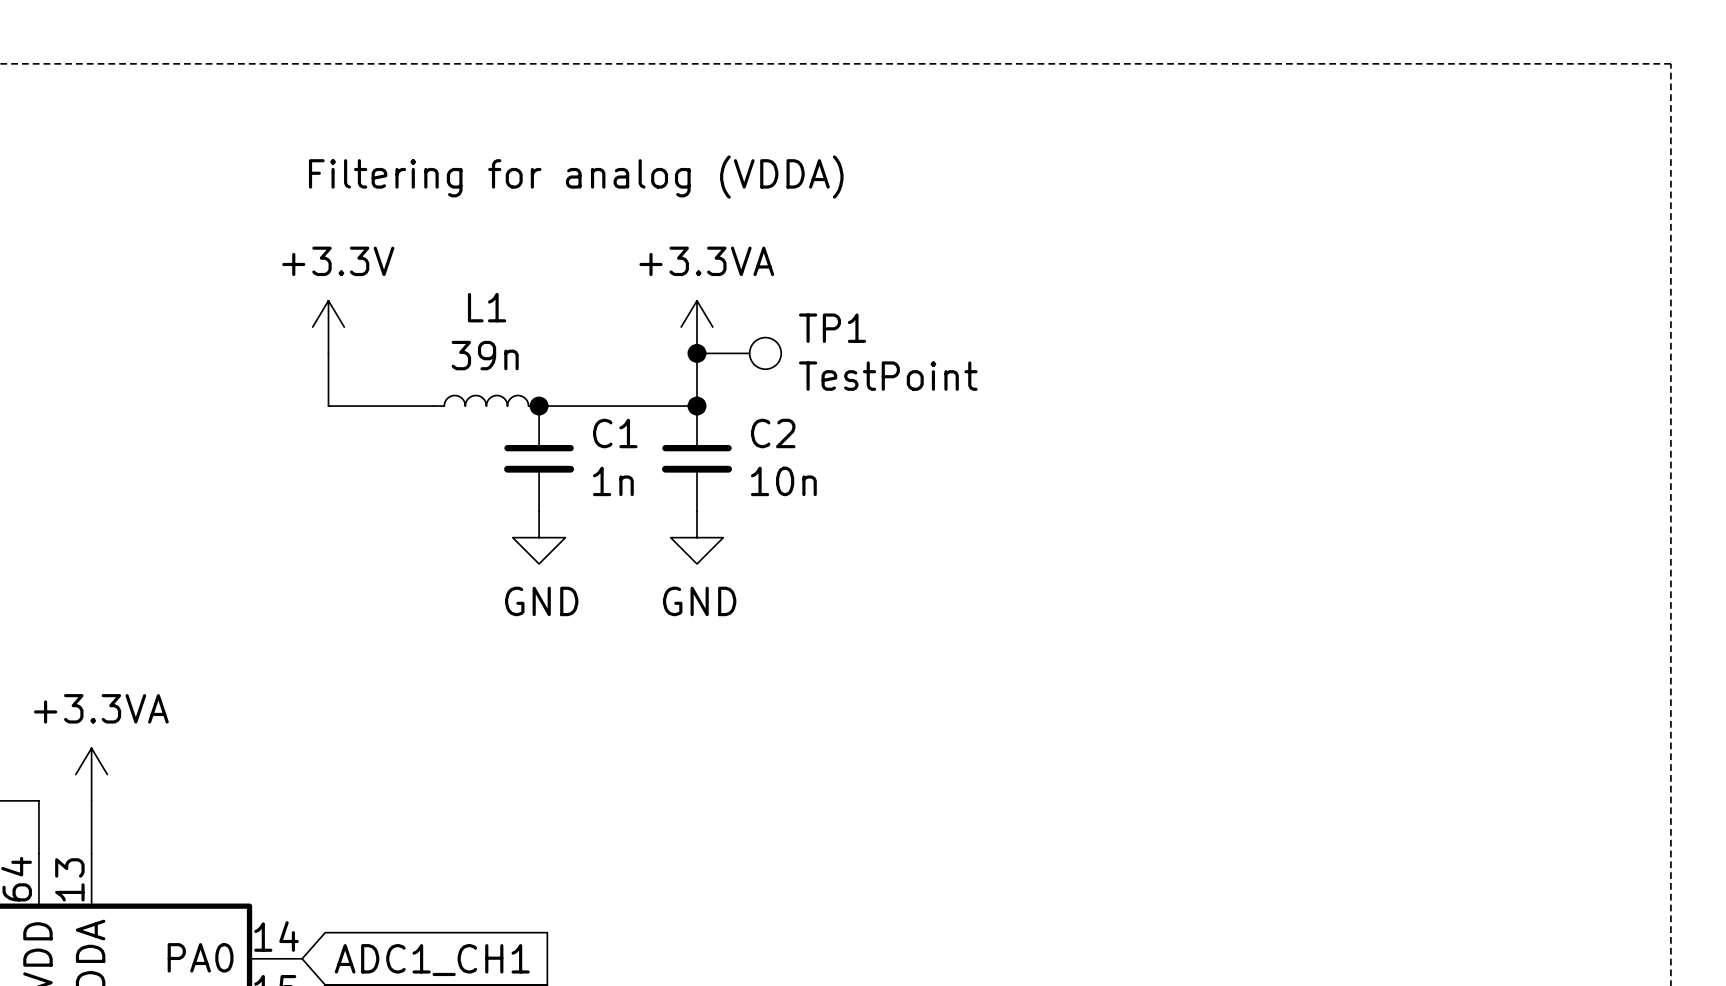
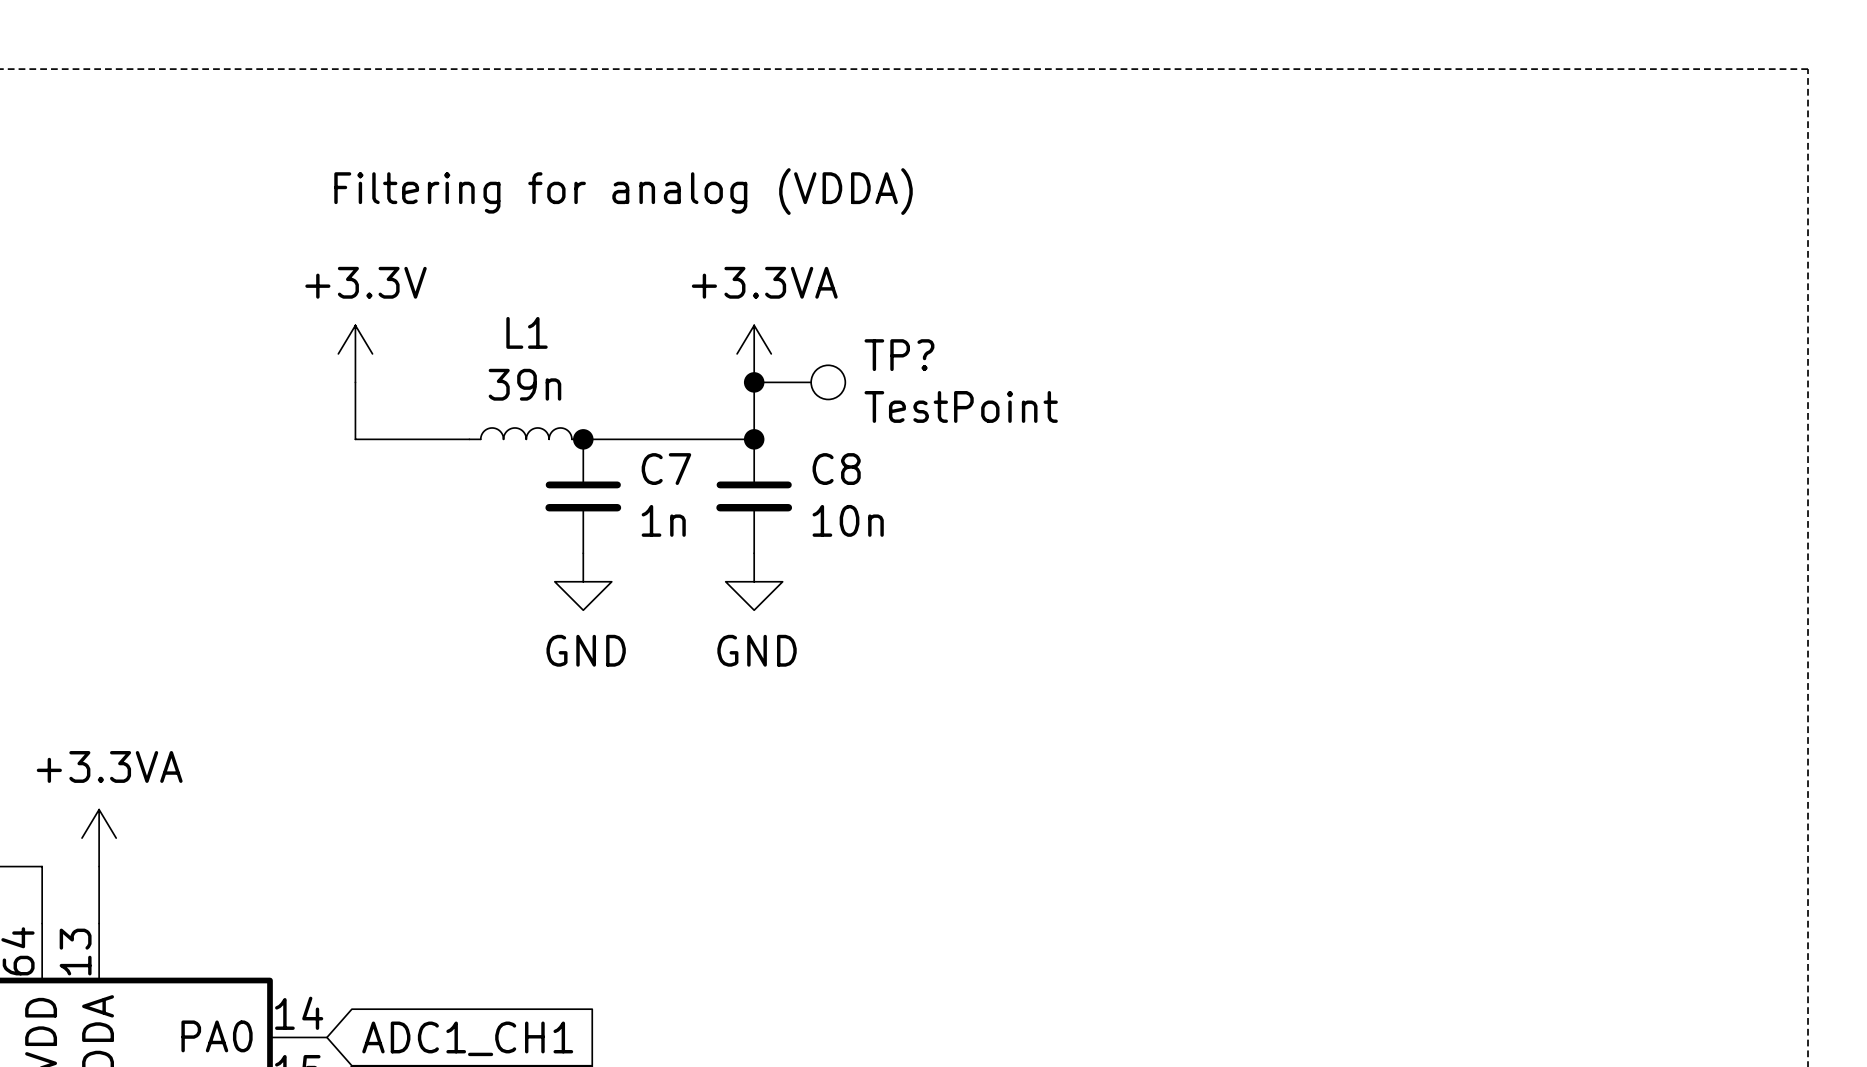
TP1 name: TP1 (832, 328) -> TP? (899, 355)
C1 name: C1 (615, 433) -> C7 (666, 469)
C2 name: C2 (773, 433) -> C8 (836, 469)

